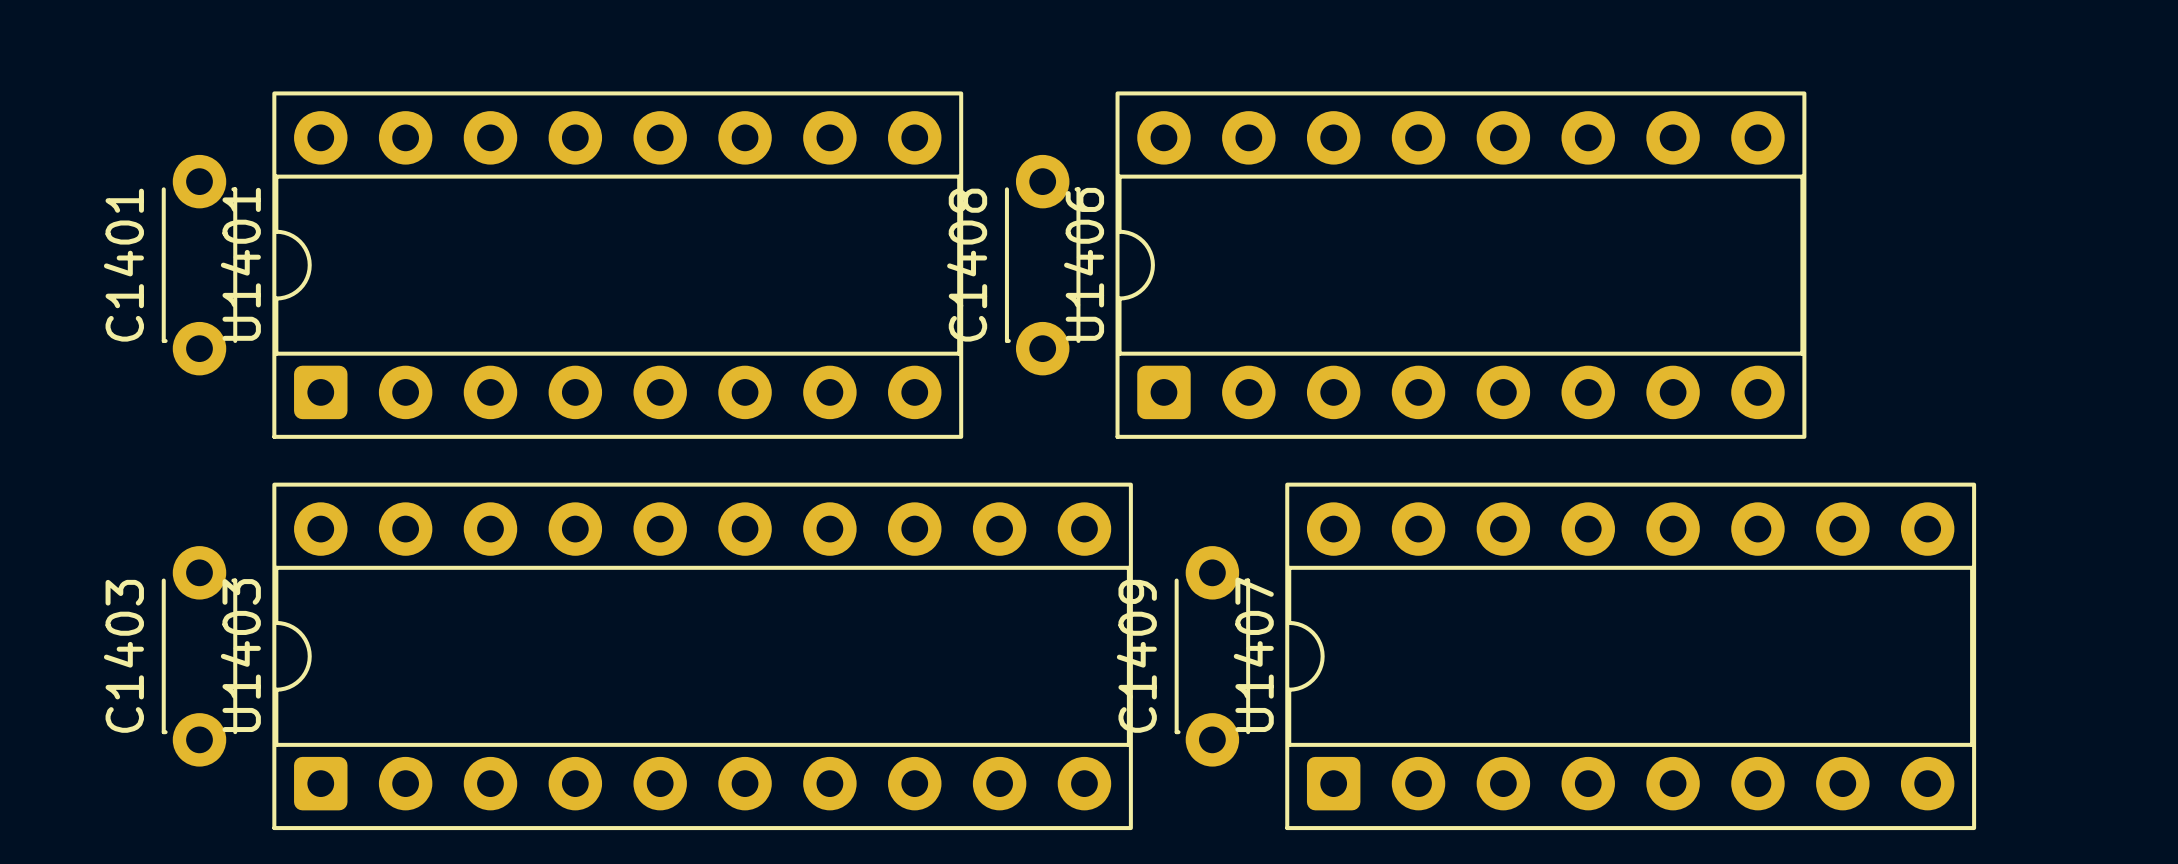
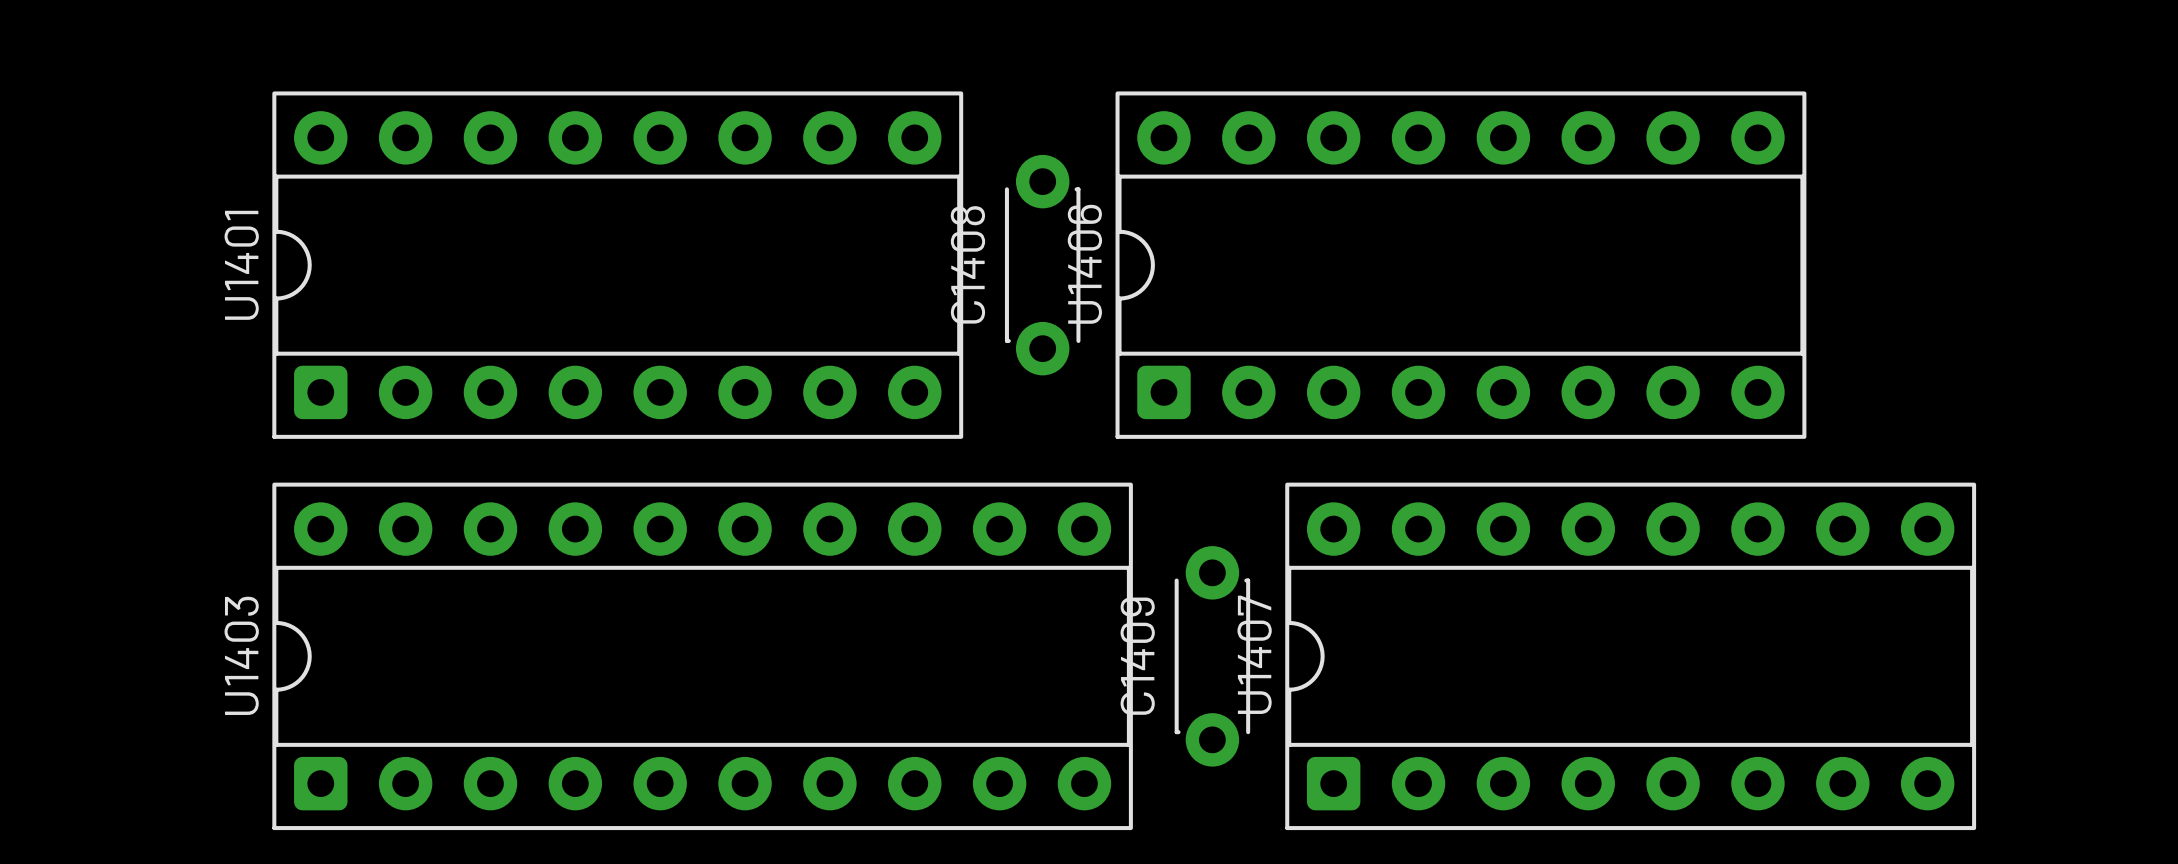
C1401: (199, 265) -> none
C1403: (199, 656) -> none

